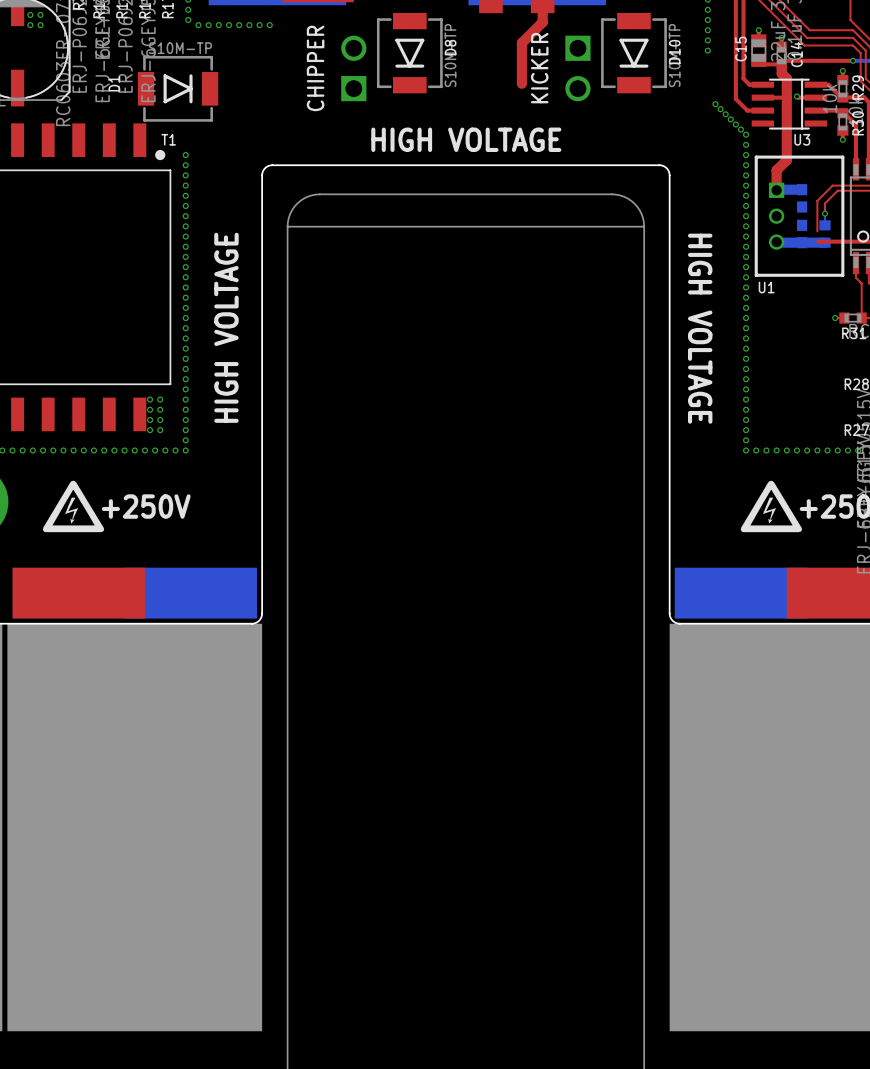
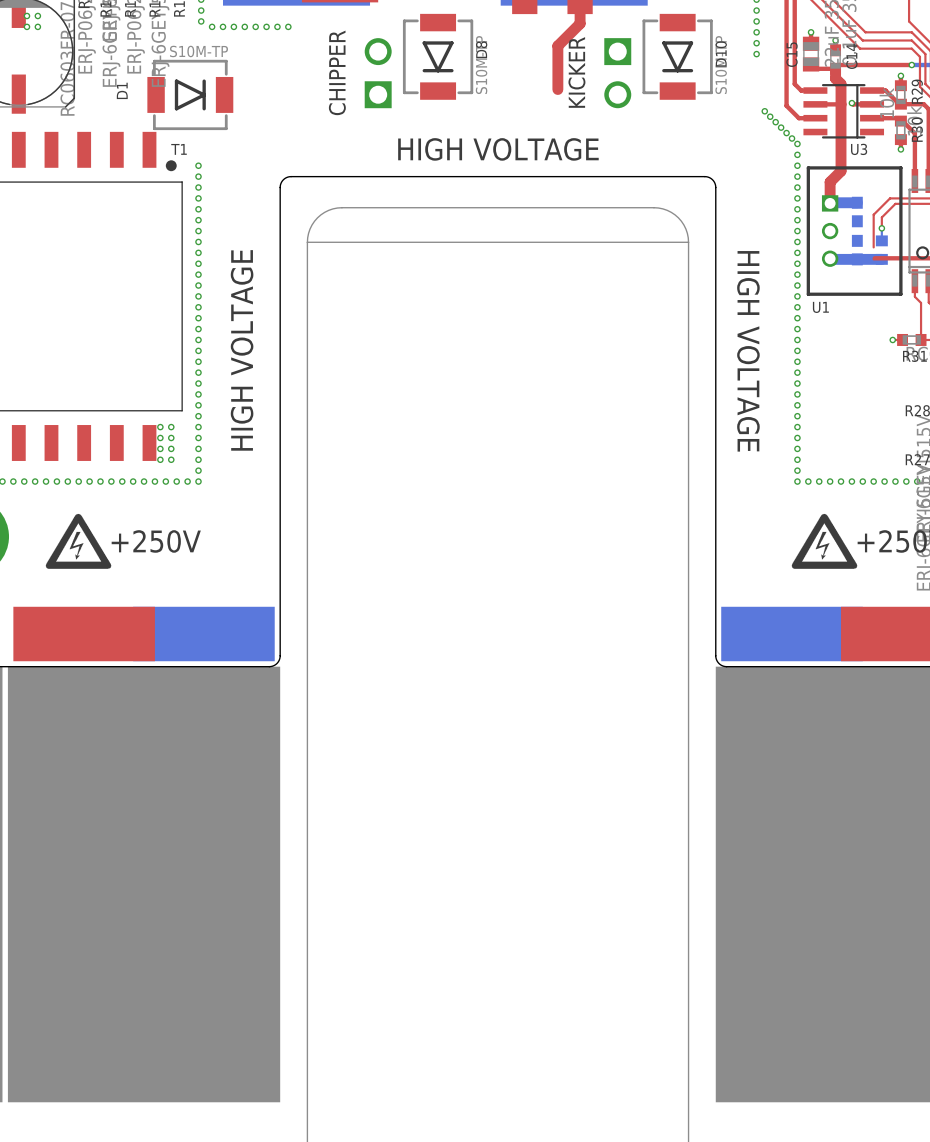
via: none -> (26, 15)
via: (30, 14) -> none
via: none -> (37, 15)
via: (40, 14) -> none
via: none -> (26, 26)
via: (30, 25) -> none
via: none -> (37, 26)
via: (40, 25) -> none

